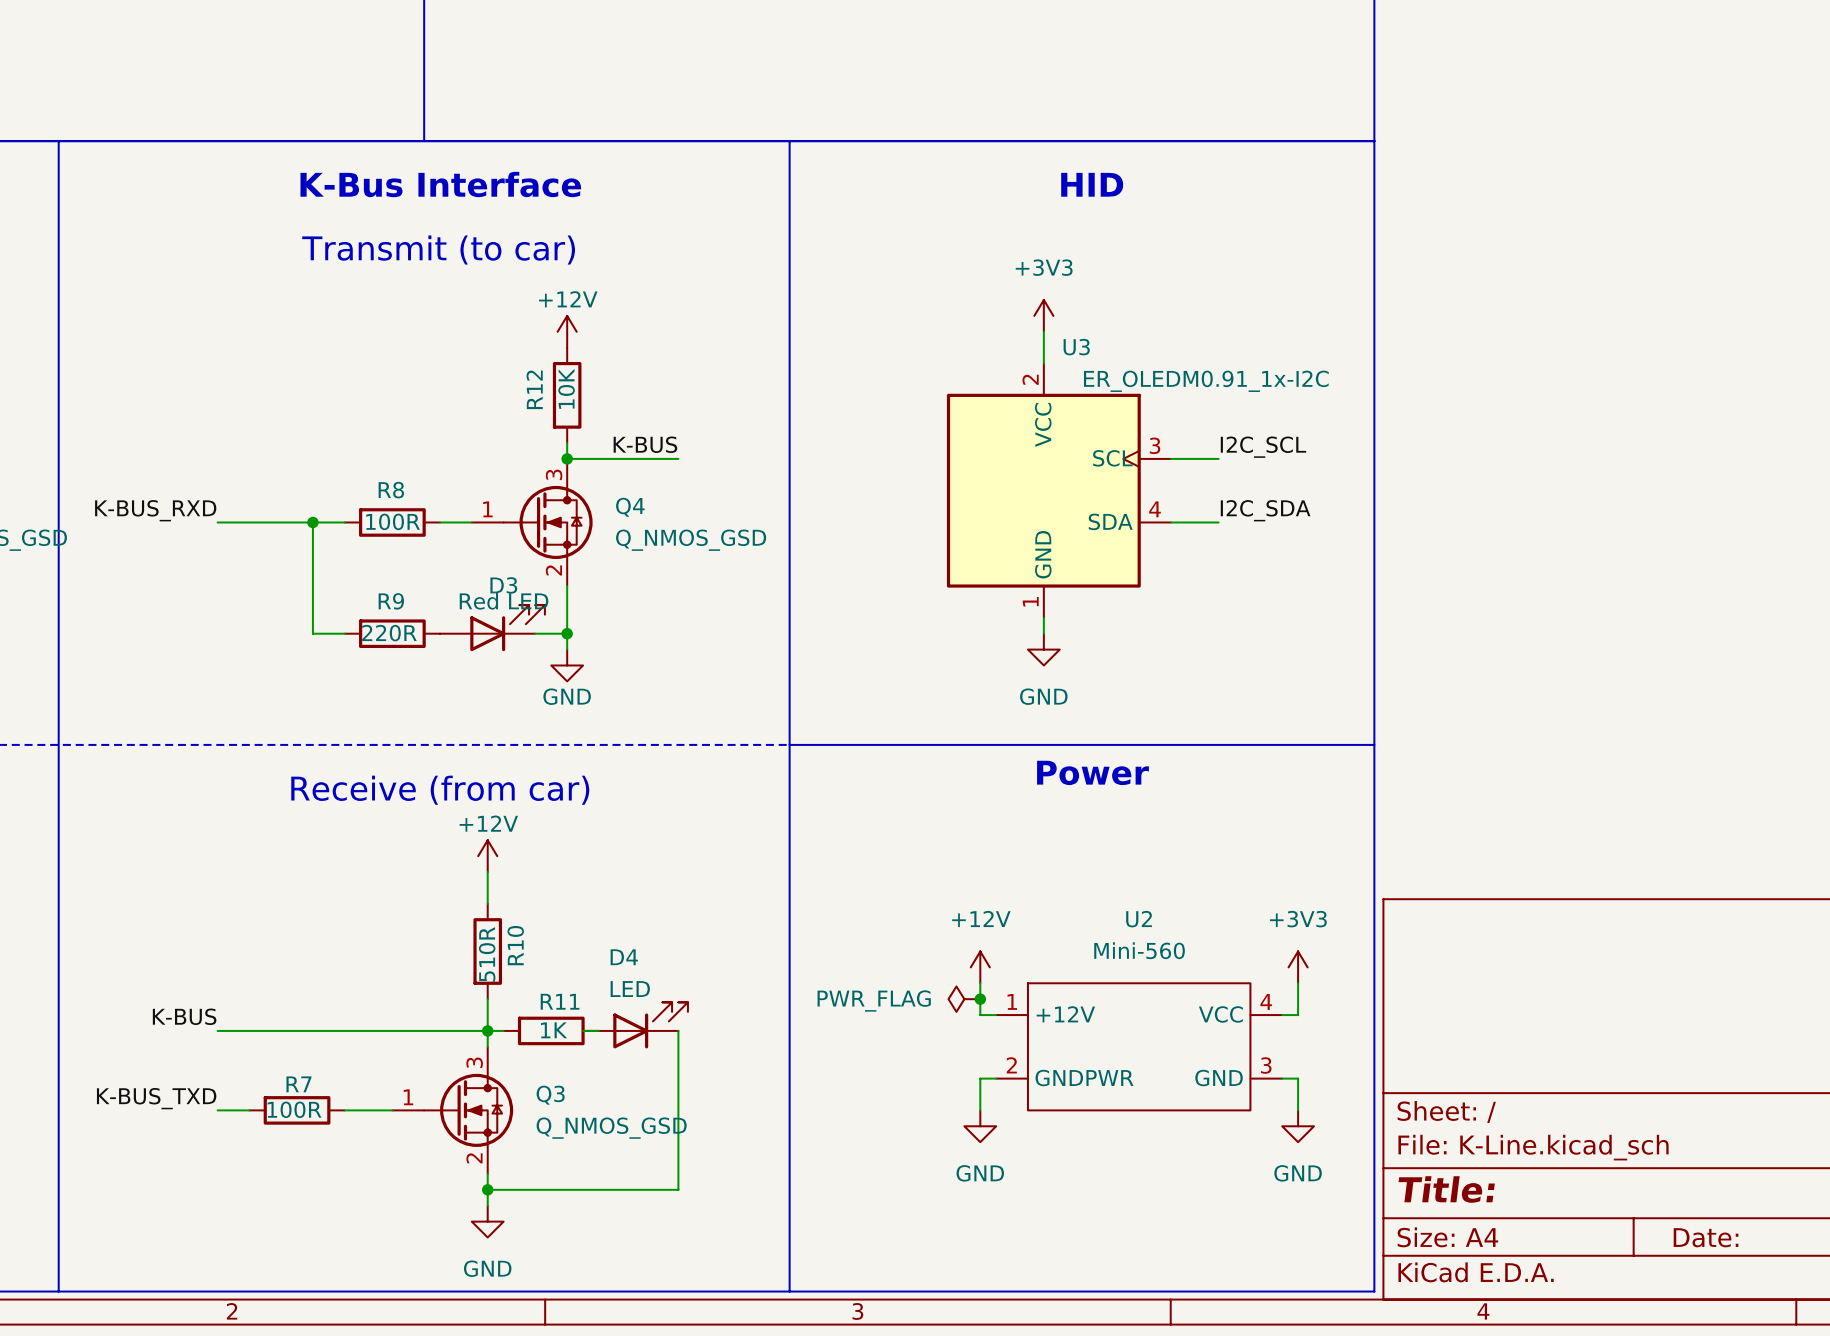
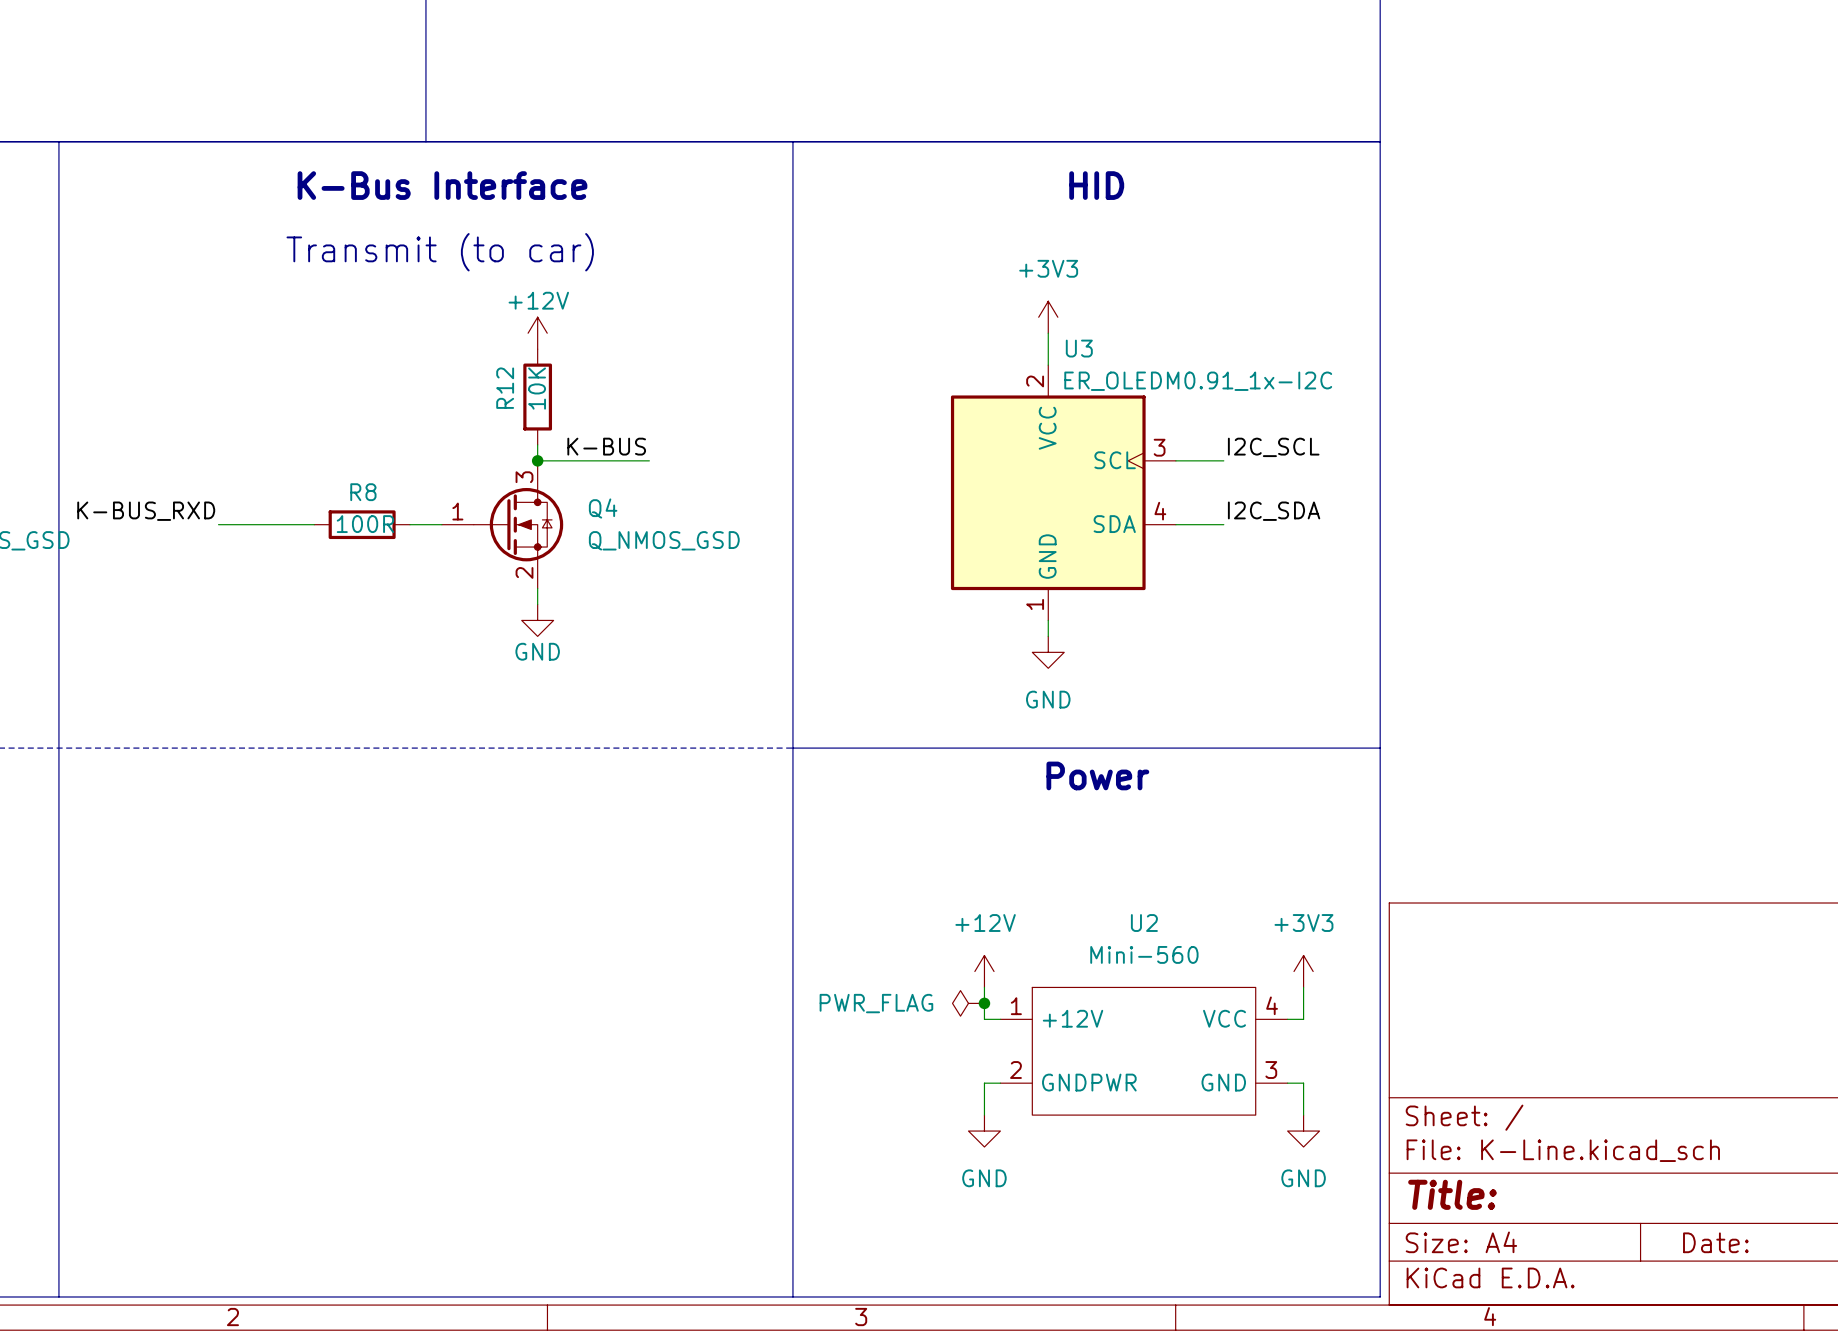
power symbol position: +12V (567, 331) -> +12V (537, 333)
R12 position: (567, 395) -> (537, 397)
wire: (567, 443) (567, 458) -> (537, 444) (537, 460) (569, 460)
label position: K-BUS (645, 444) -> K-BUS (606, 446)
junction position: (567, 458) -> (537, 460)
wire: (646, 458) (678, 458) -> none
junction: (312, 522) -> none
wire: (344, 522) (312, 522) (312, 633) (344, 633) -> none
R8 position: (392, 522) -> (362, 524)
Q4 position: (532, 522) -> (502, 524)
wire: none -> (537, 588) (537, 604)
wire: (567, 586) (567, 649) -> none
D3: Red LED (492, 628) -> none
R9: 220R (392, 633) -> none
wire: (535, 633) (567, 633) -> none
junction: (567, 633) -> none
power symbol position: GND (567, 665) -> GND (537, 620)
text: Receive (from car) (440, 790) -> none
power symbol: +12V (487, 856) -> none
wire: (487, 872) (487, 903) -> none
R10: 510R (487, 951) -> none
wire: (487, 999) (487, 1046) -> none
label: K-BUS (184, 1016) -> none
D4: LED (635, 1025) -> none
wire: (217, 1030) (503, 1030) -> none
junction: (487, 1030) -> none
R11: 1K (551, 1030) -> none
wire: (583, 1030) (598, 1030) -> none
wire: (678, 1030) (678, 1189) (487, 1189) -> none
label: K-BUS_TXD (156, 1098) -> none
wire: (217, 1110) (249, 1110) -> none
R7: 100R (297, 1110) -> none
wire: (344, 1110) (392, 1110) -> none
Q3: Q_NMOS_GSD (452, 1110) -> none
wire: (487, 1173) (487, 1205) -> none
junction: (487, 1189) -> none
power symbol: GND (487, 1221) -> none

